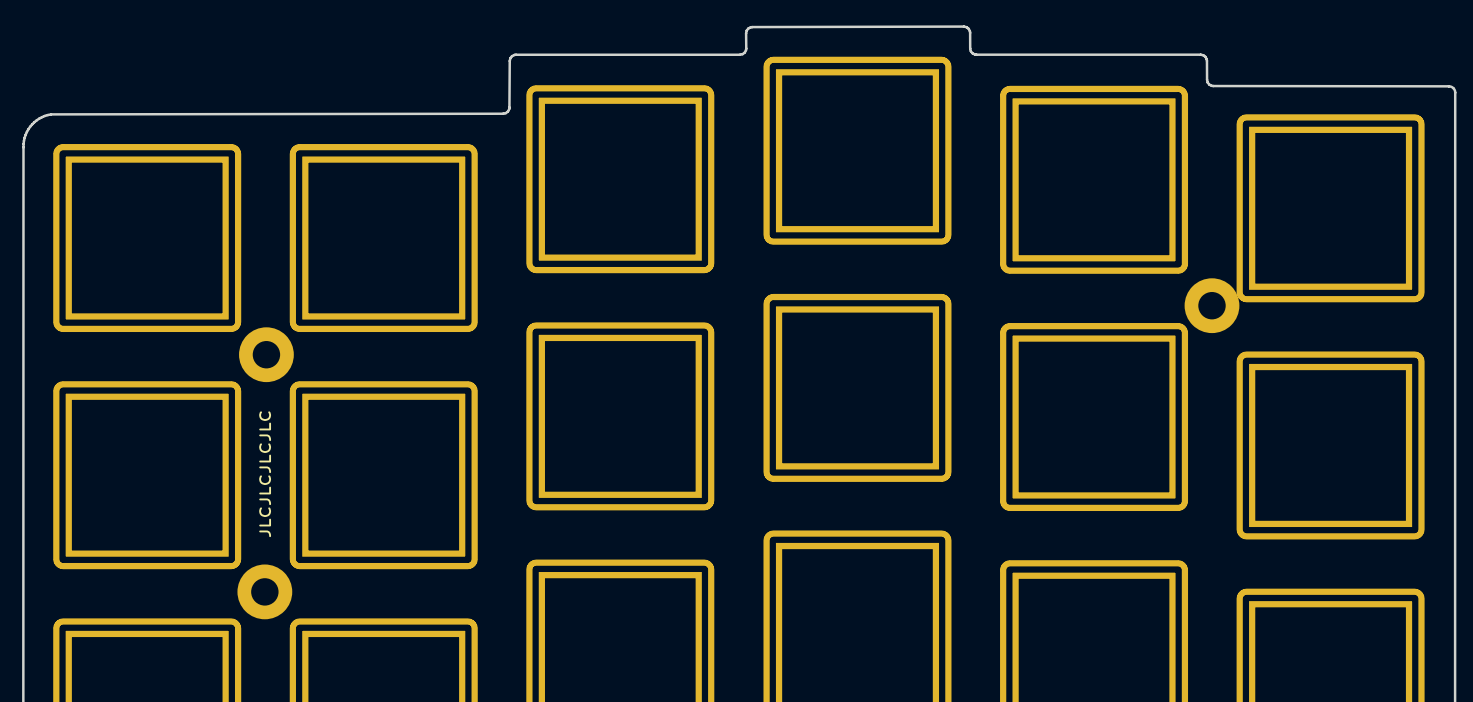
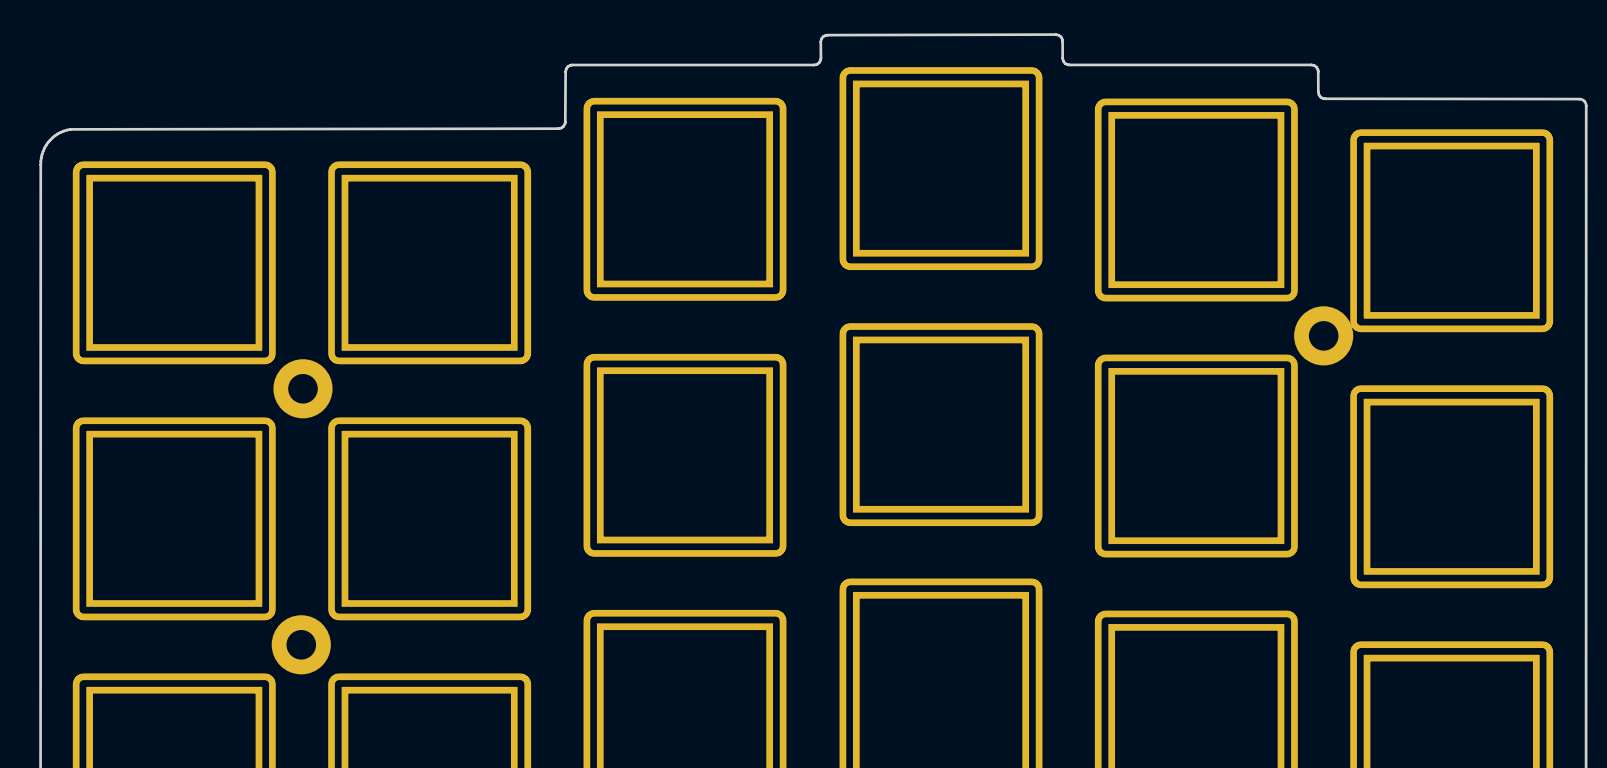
text: JLCJLCJLCJLC (265, 474) -> none

